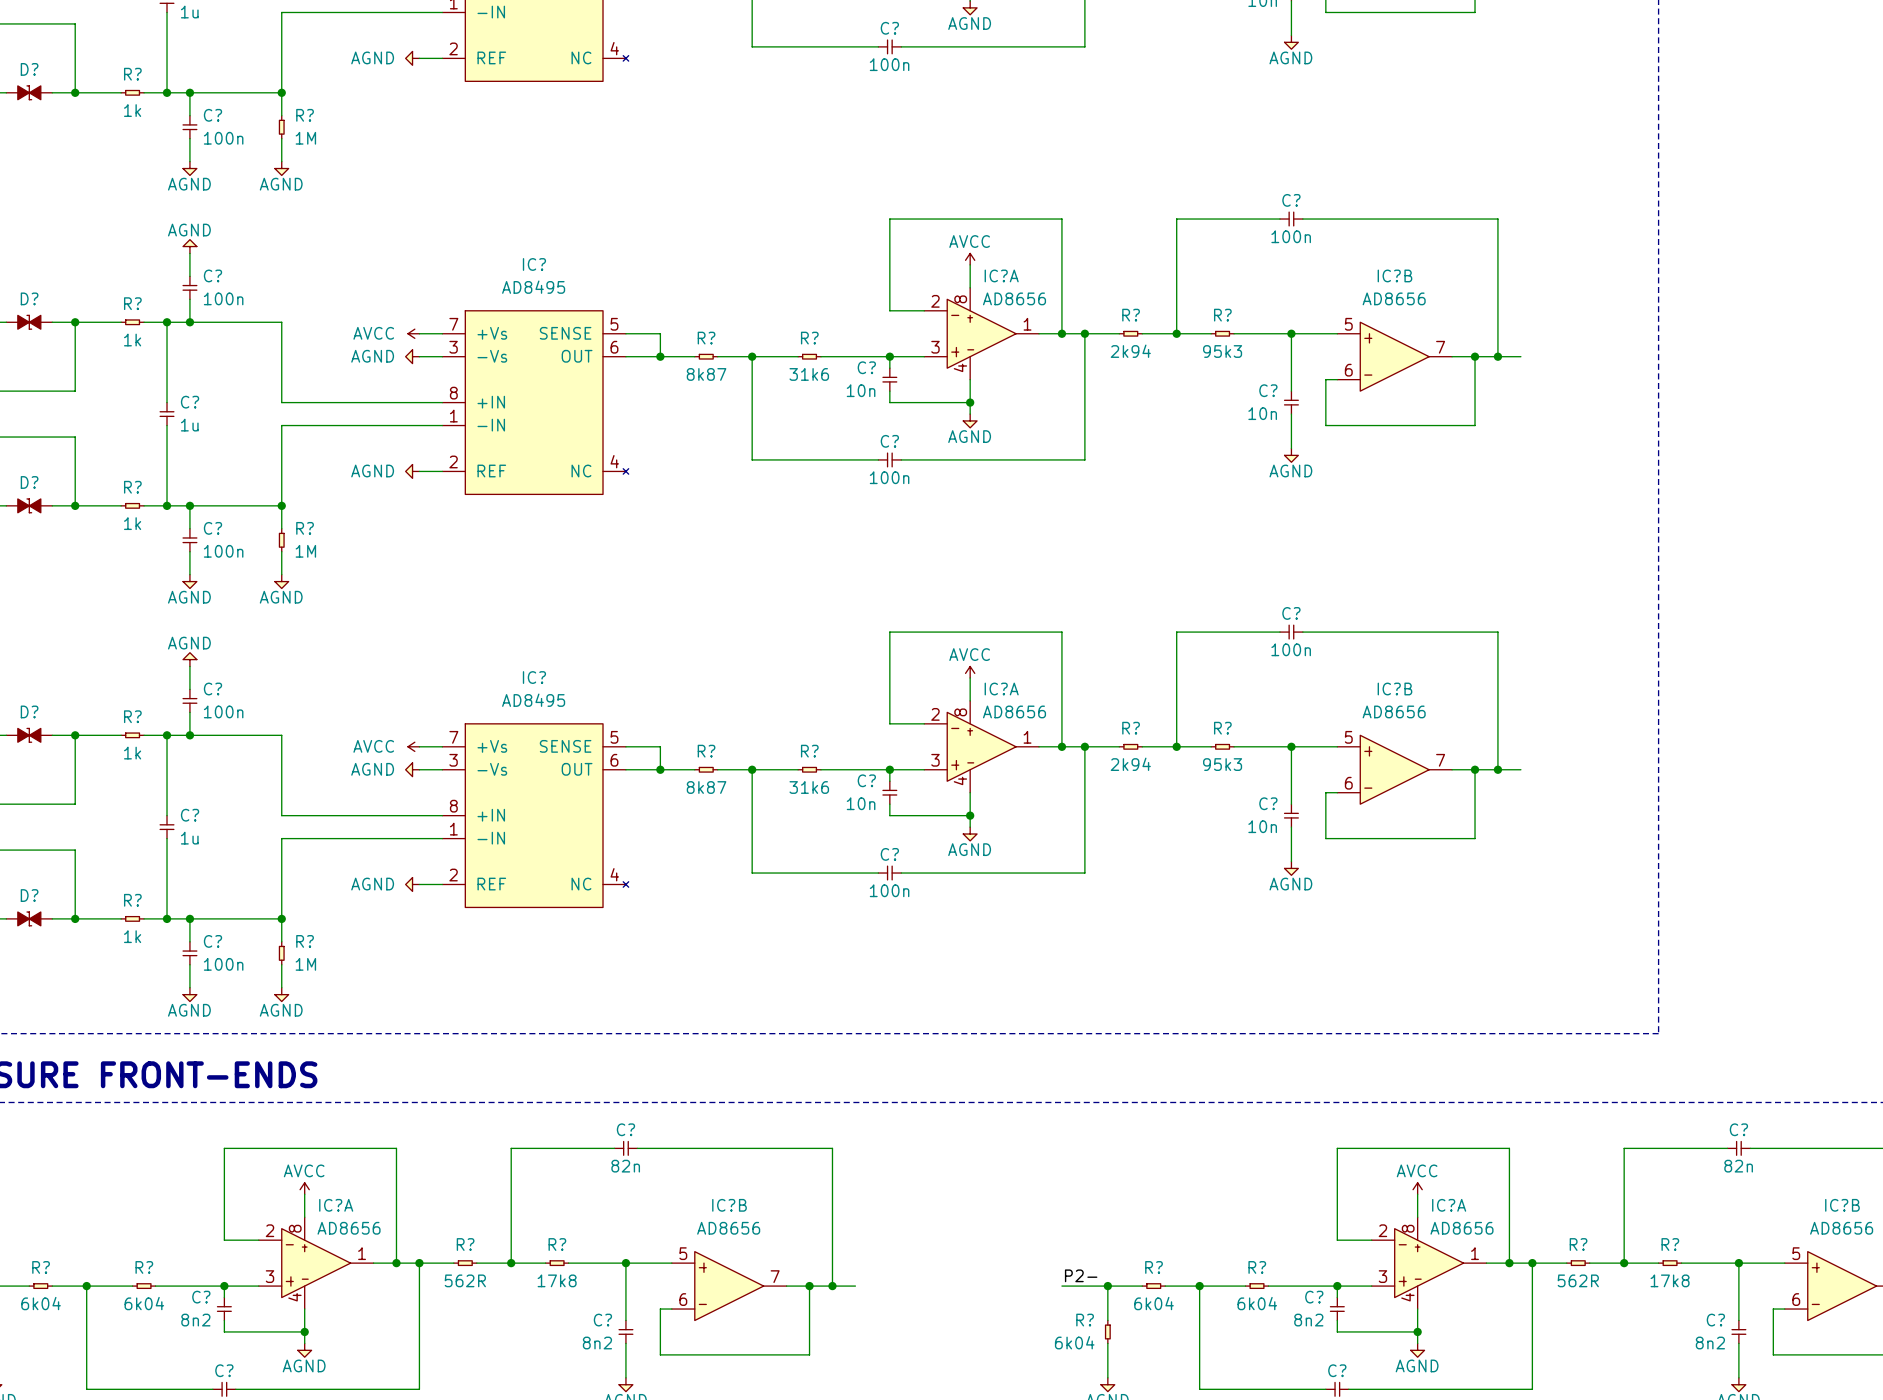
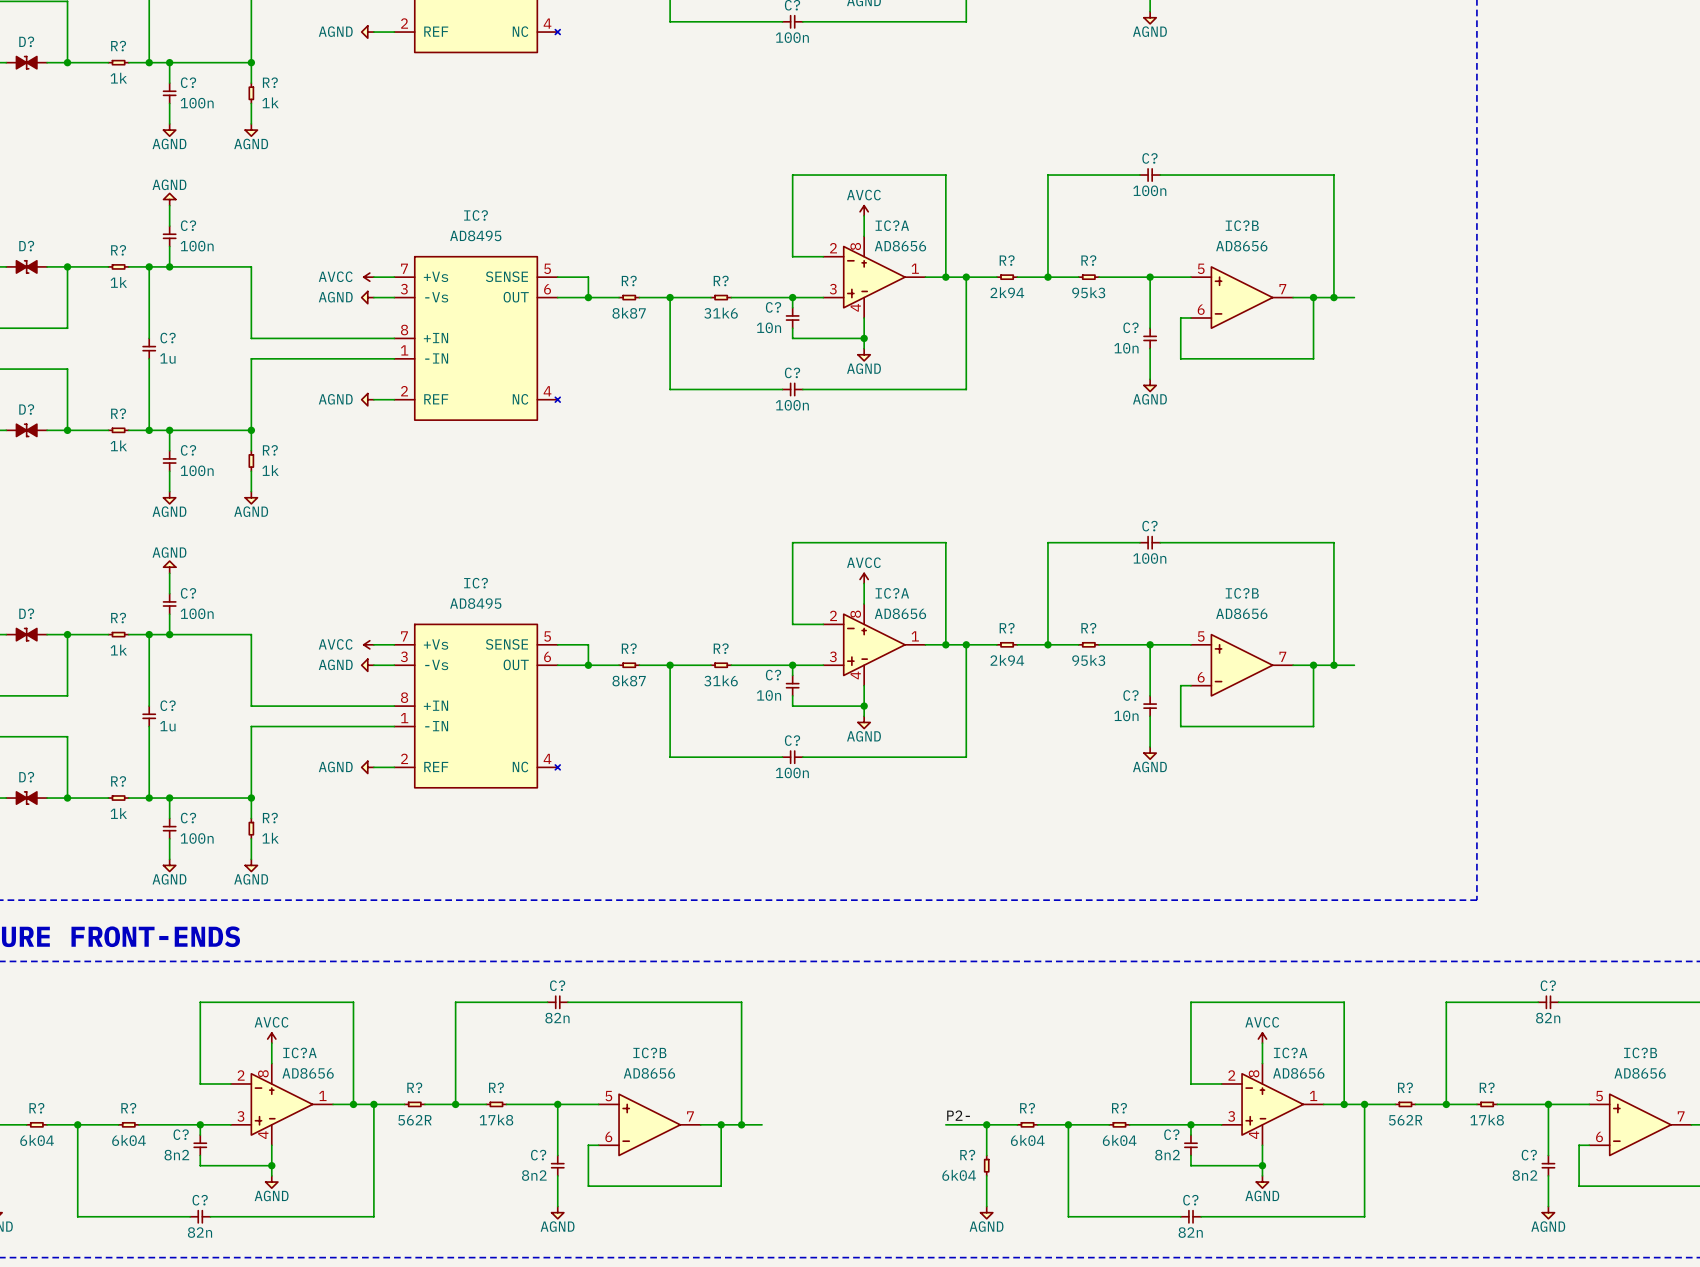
R? value: 1M (305, 138) -> 1k (270, 102)
R? value: 1M (305, 551) -> 1k (270, 470)
R? value: 1M (305, 964) -> 1k (270, 838)

